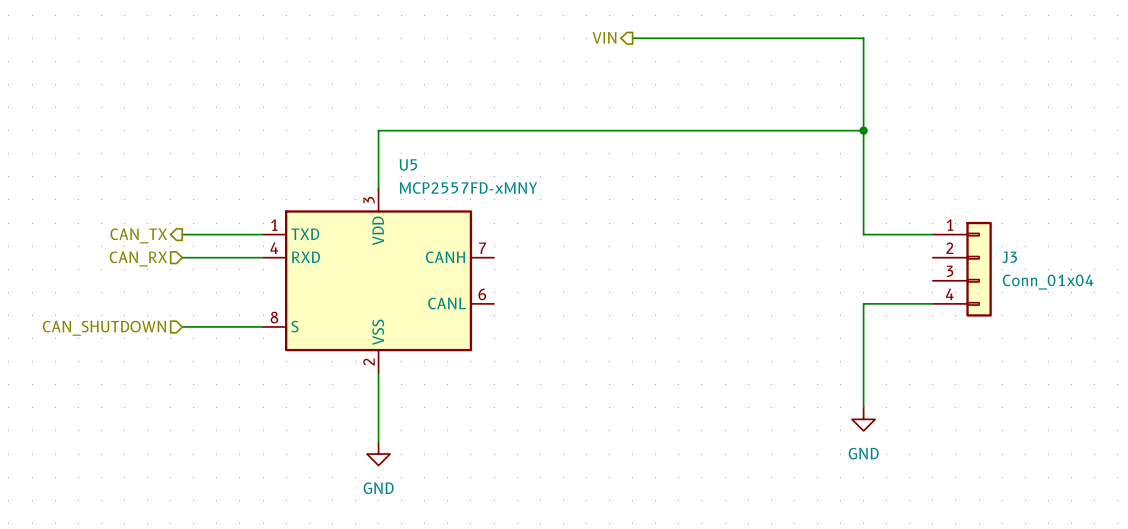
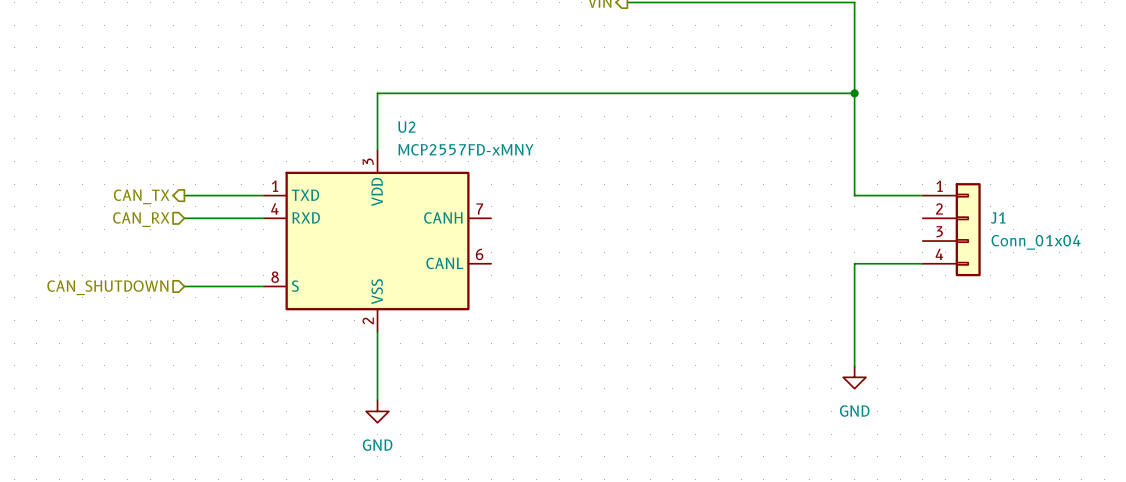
U5 name: U5 (408, 164) -> U2 (406, 127)
J3 name: J3 (1009, 257) -> J1 (998, 217)

